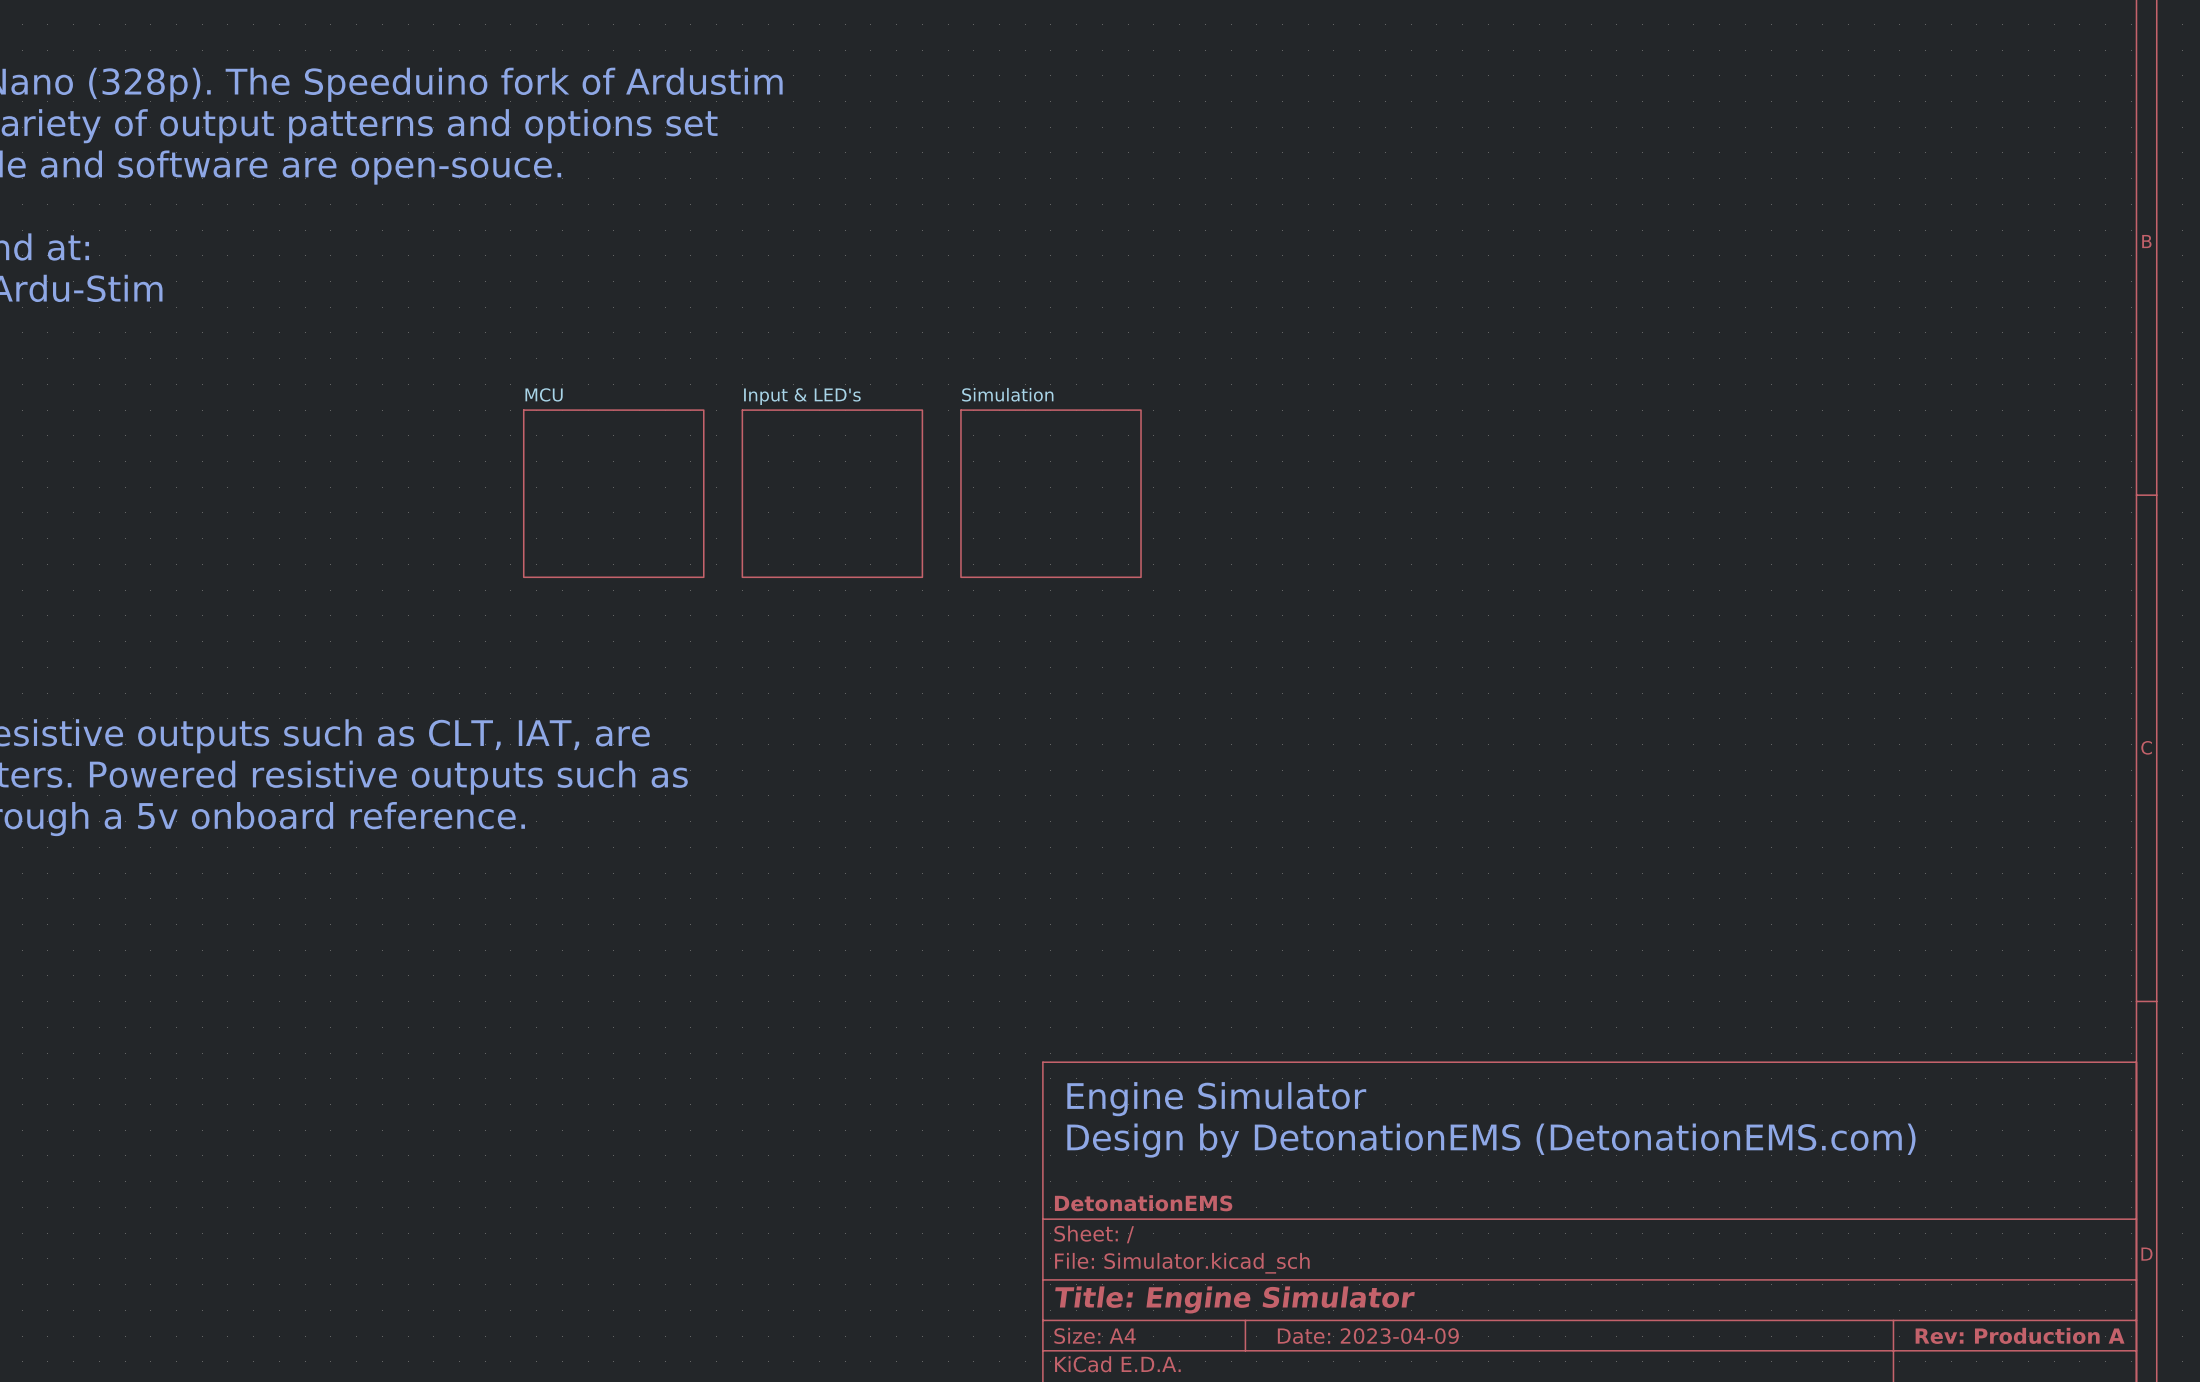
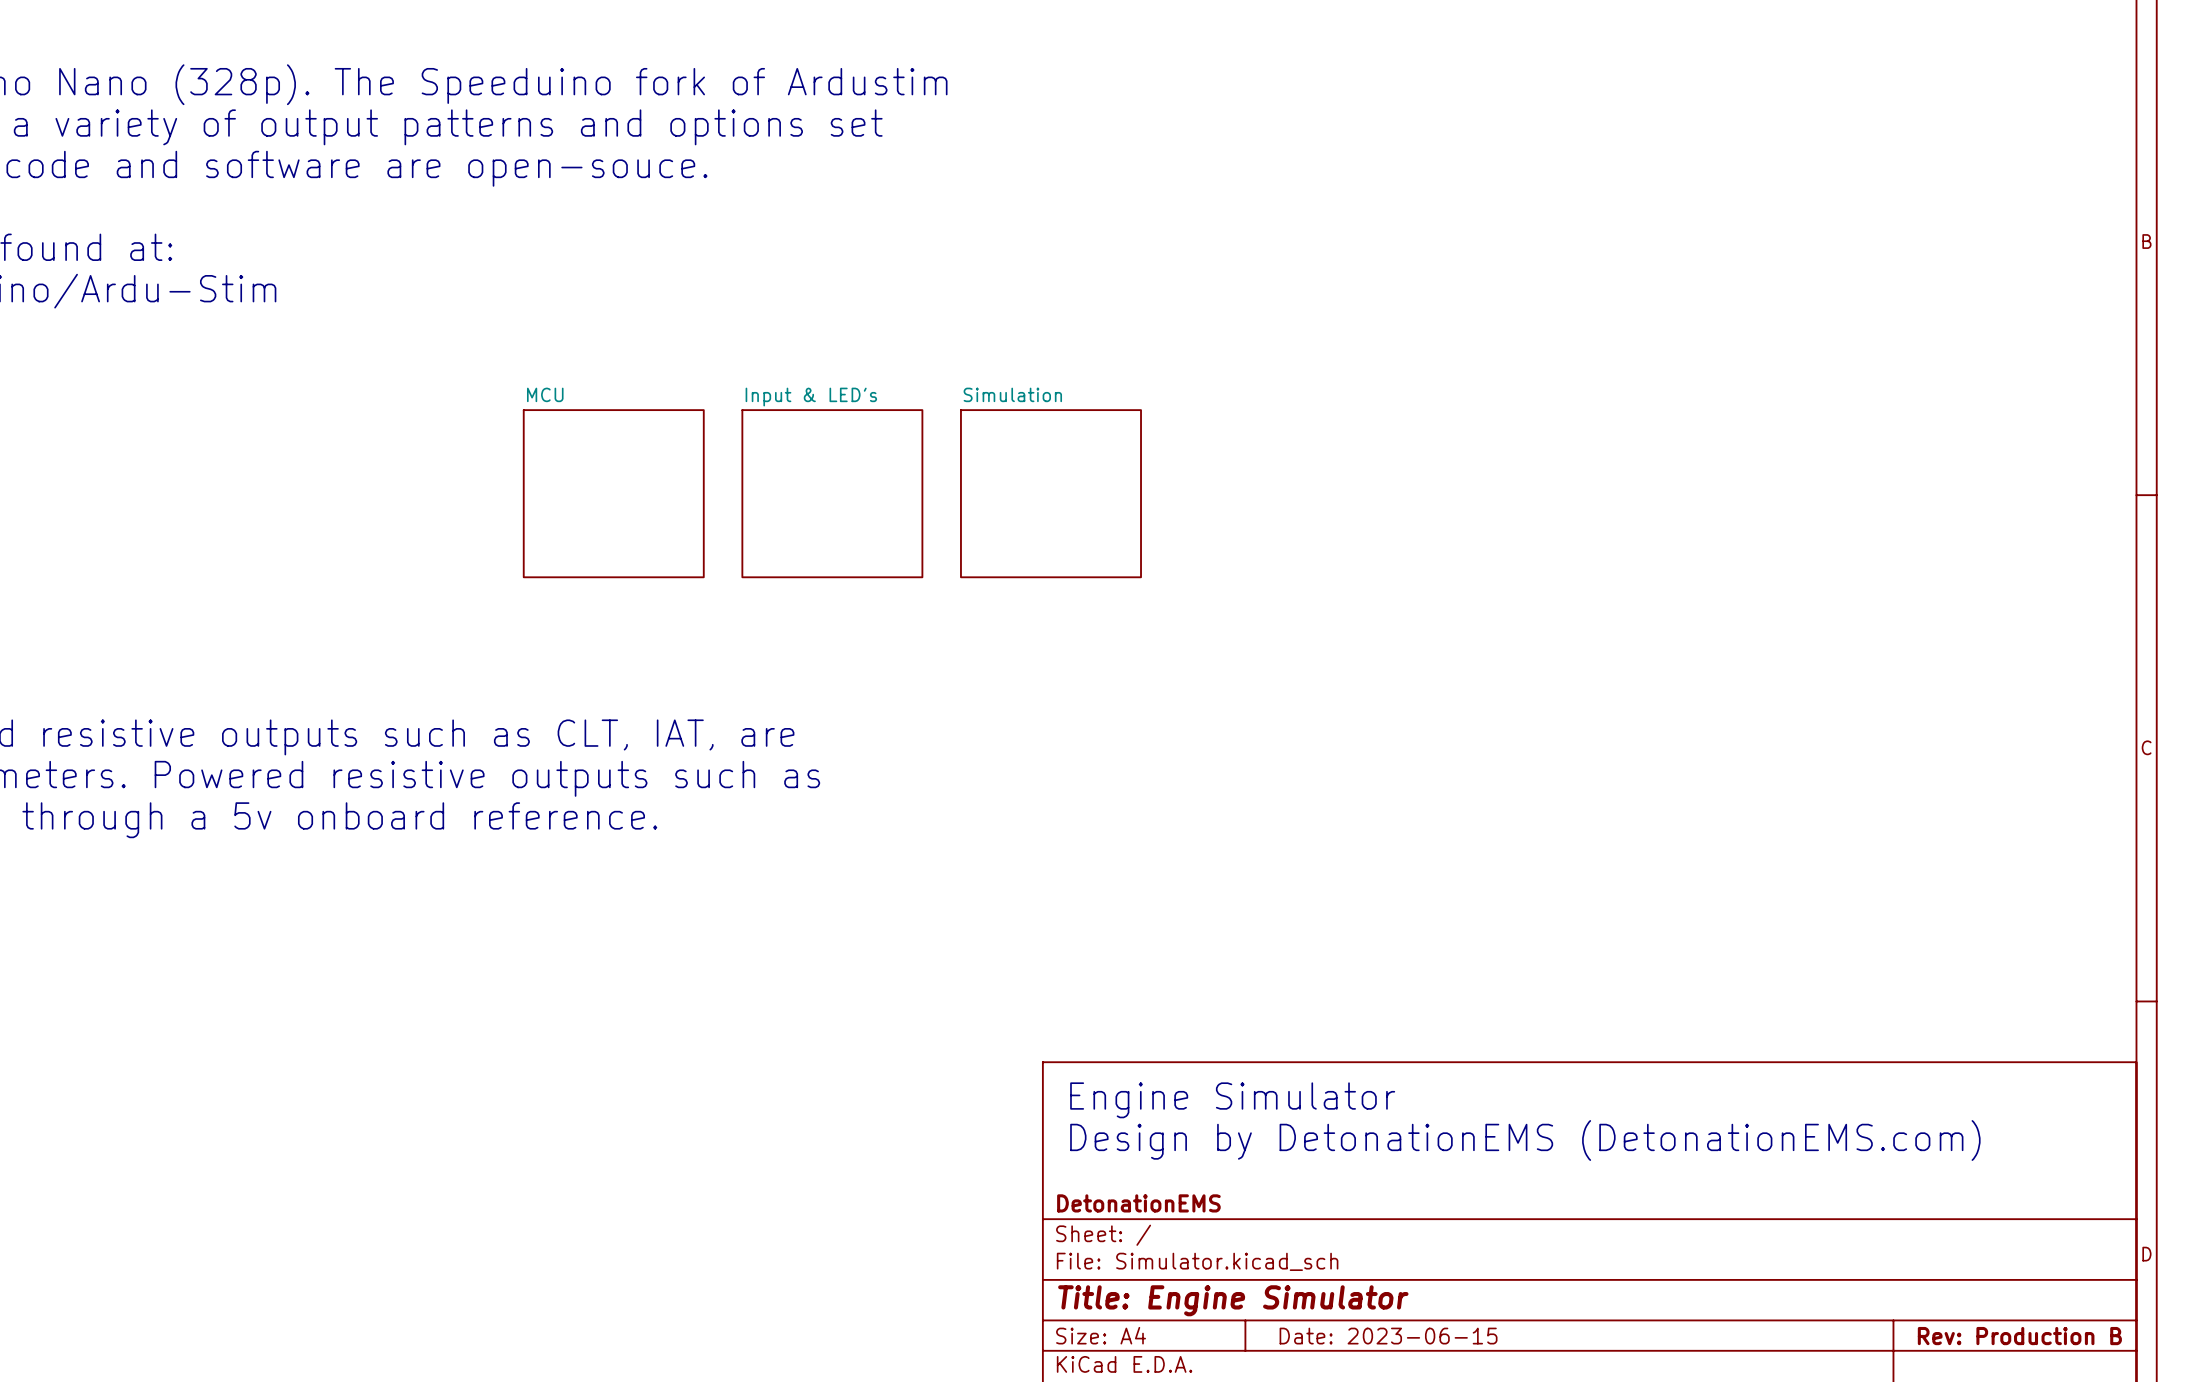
title block: Rev: Production A (2020, 1335) -> Rev: Production B (2019, 1336)
title block: Date: 2023-04-09 (1368, 1336) -> Date: 2023-06-15 (1388, 1336)

